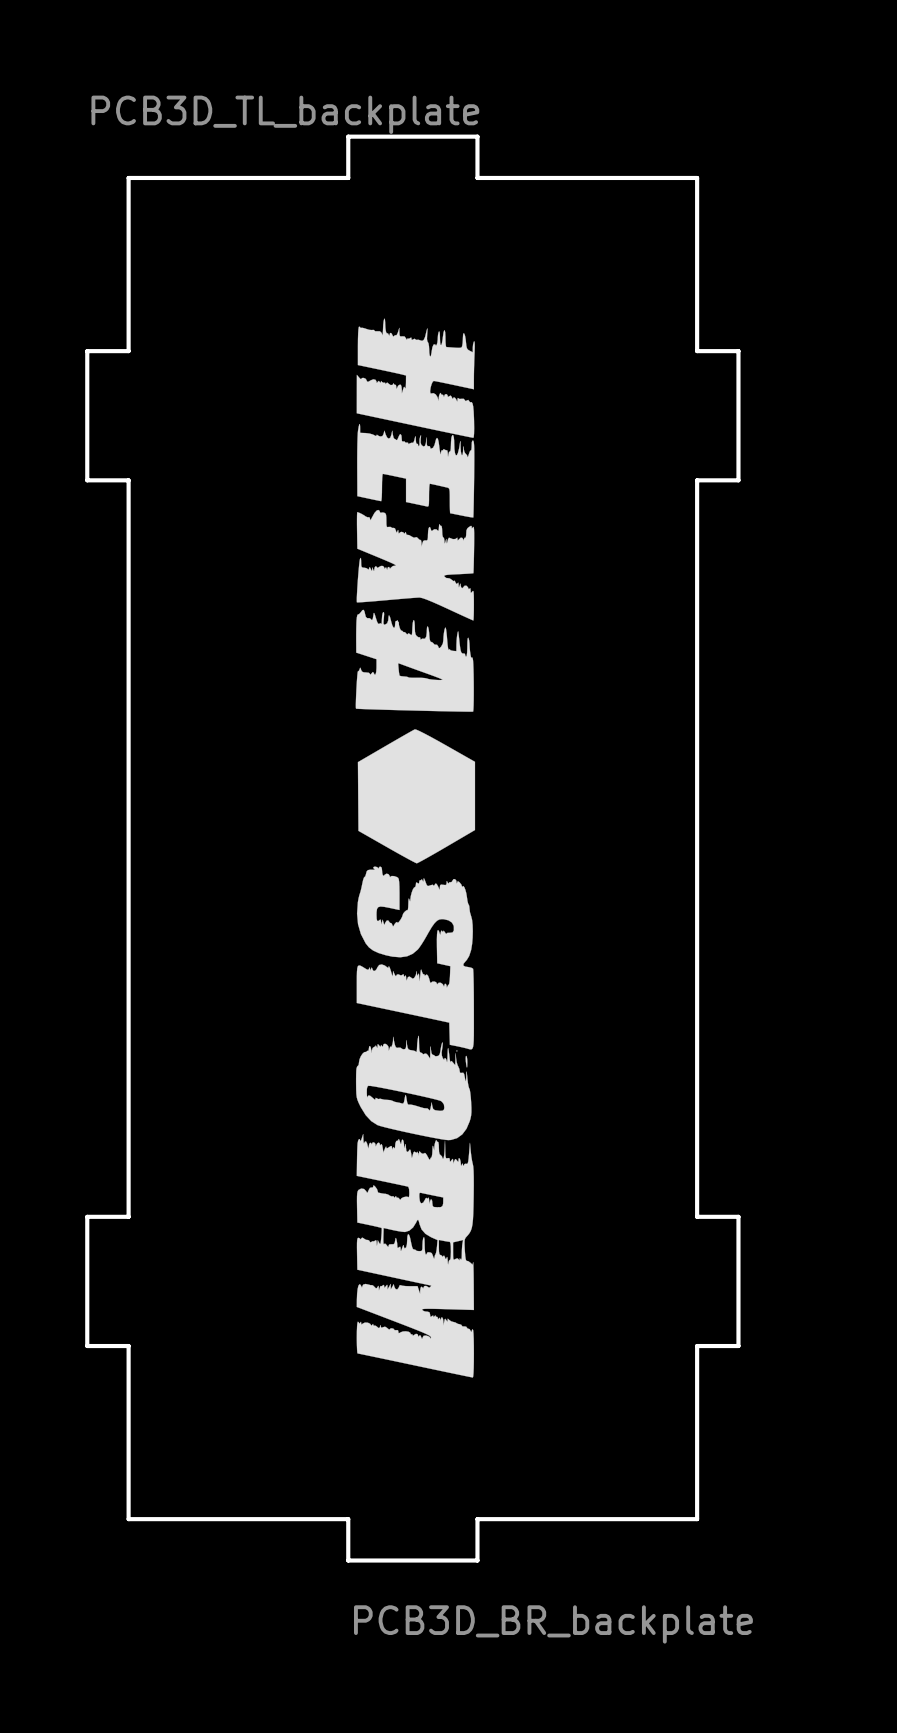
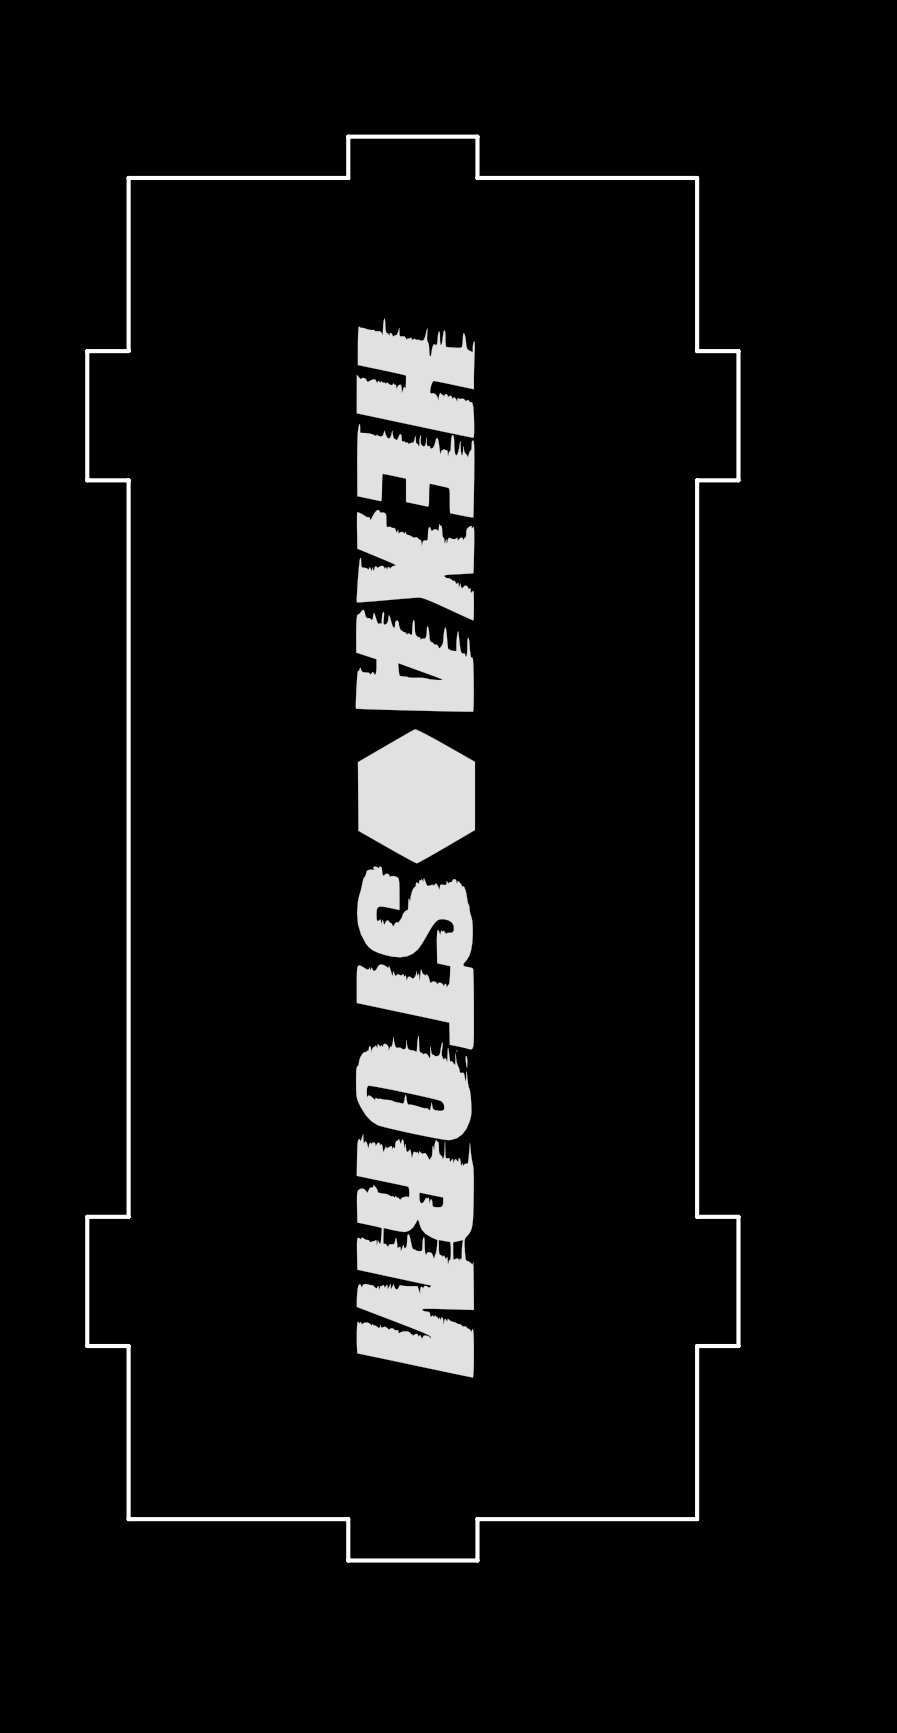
text: PCB3D_TL_backplate (285, 114) -> none
text: PCB3D_BR_backplate (553, 1624) -> none

